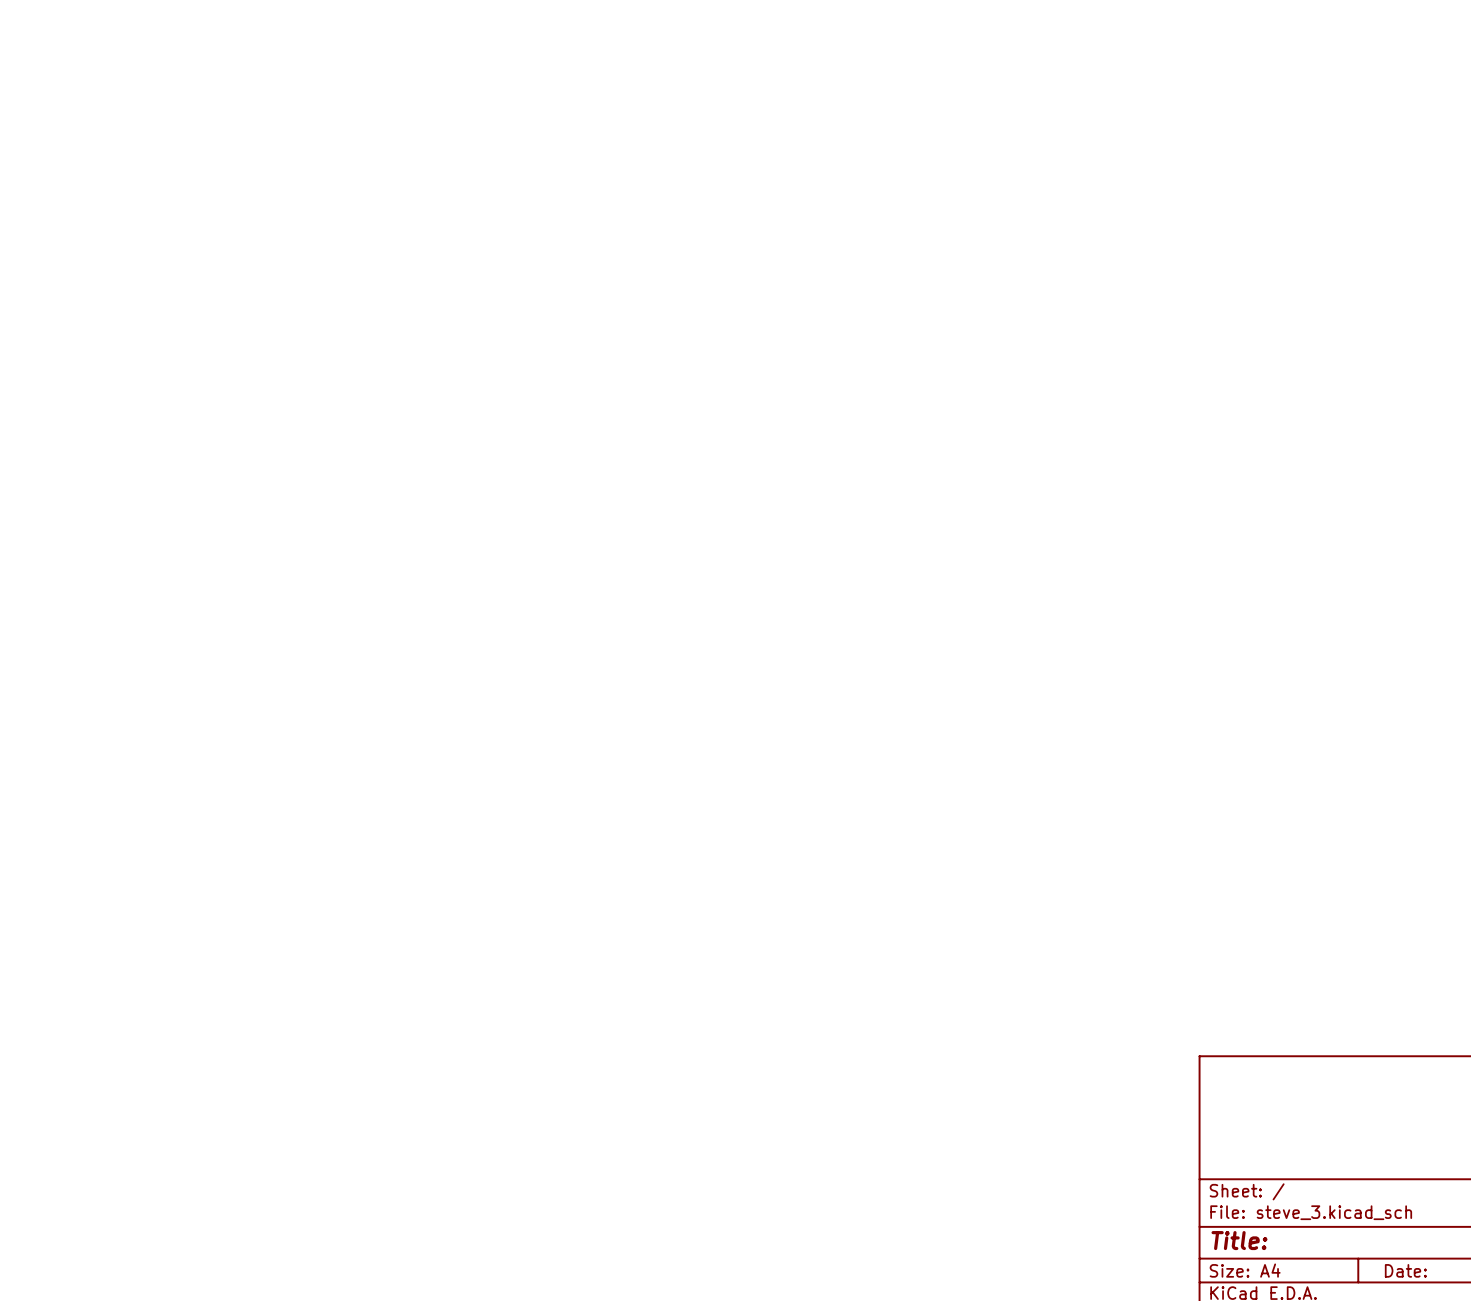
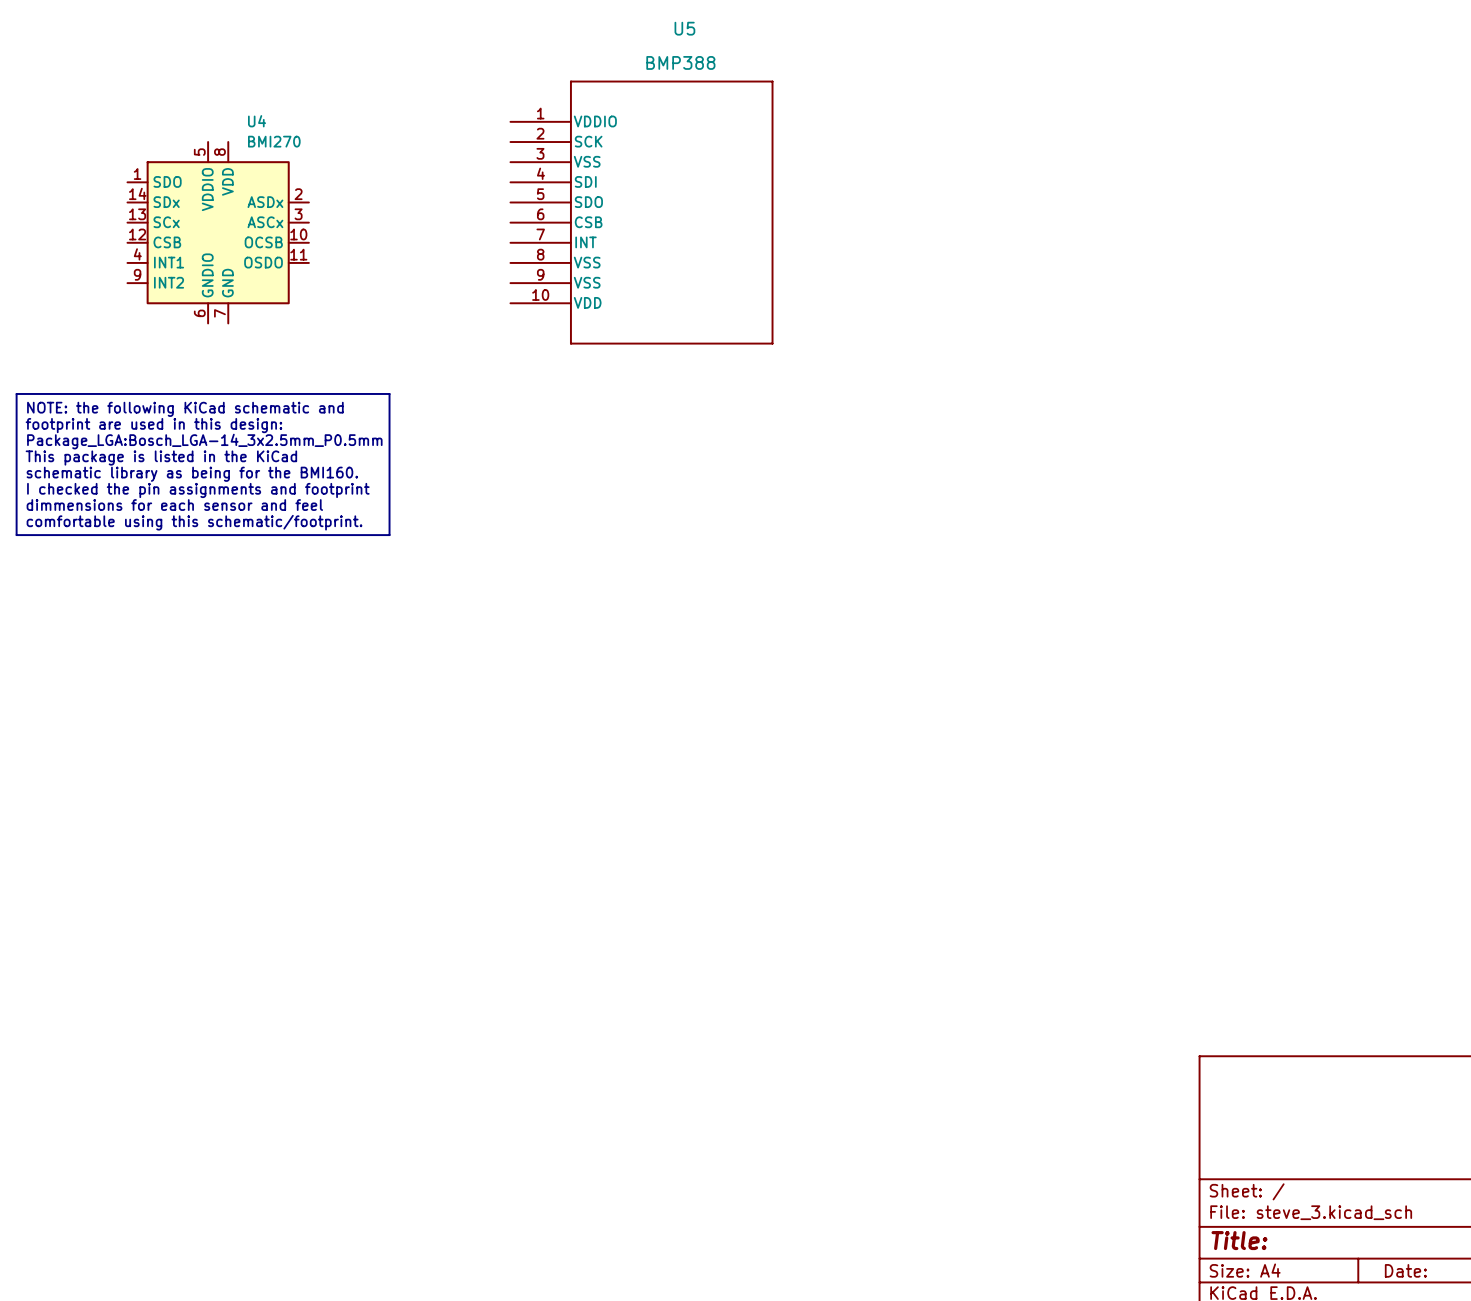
U5: none -> BMP388 (641, 212)
U4: none -> BMI270 (218, 232)
line: none -> (16, 393) (389, 393) (389, 535) (16, 535) (16, 393)
text: none -> NOTE: the following KiCad schematic and (185, 409)
text: none -> footprint are used in this design: (153, 425)
text: none -> Package_LGA:Bosch_LGA-14_3x2.5mm_P0.5mm (204, 441)
text: none -> This package is listed in the KiCad (161, 458)
text: none -> schematic library as being for the BMI160. (192, 474)
text: none -> I checked the pin assignments and footprint (198, 490)
text: none -> dimmensions for each sensor and feel (174, 505)
text: none -> comfortable using this schematic/footprint. (194, 522)

